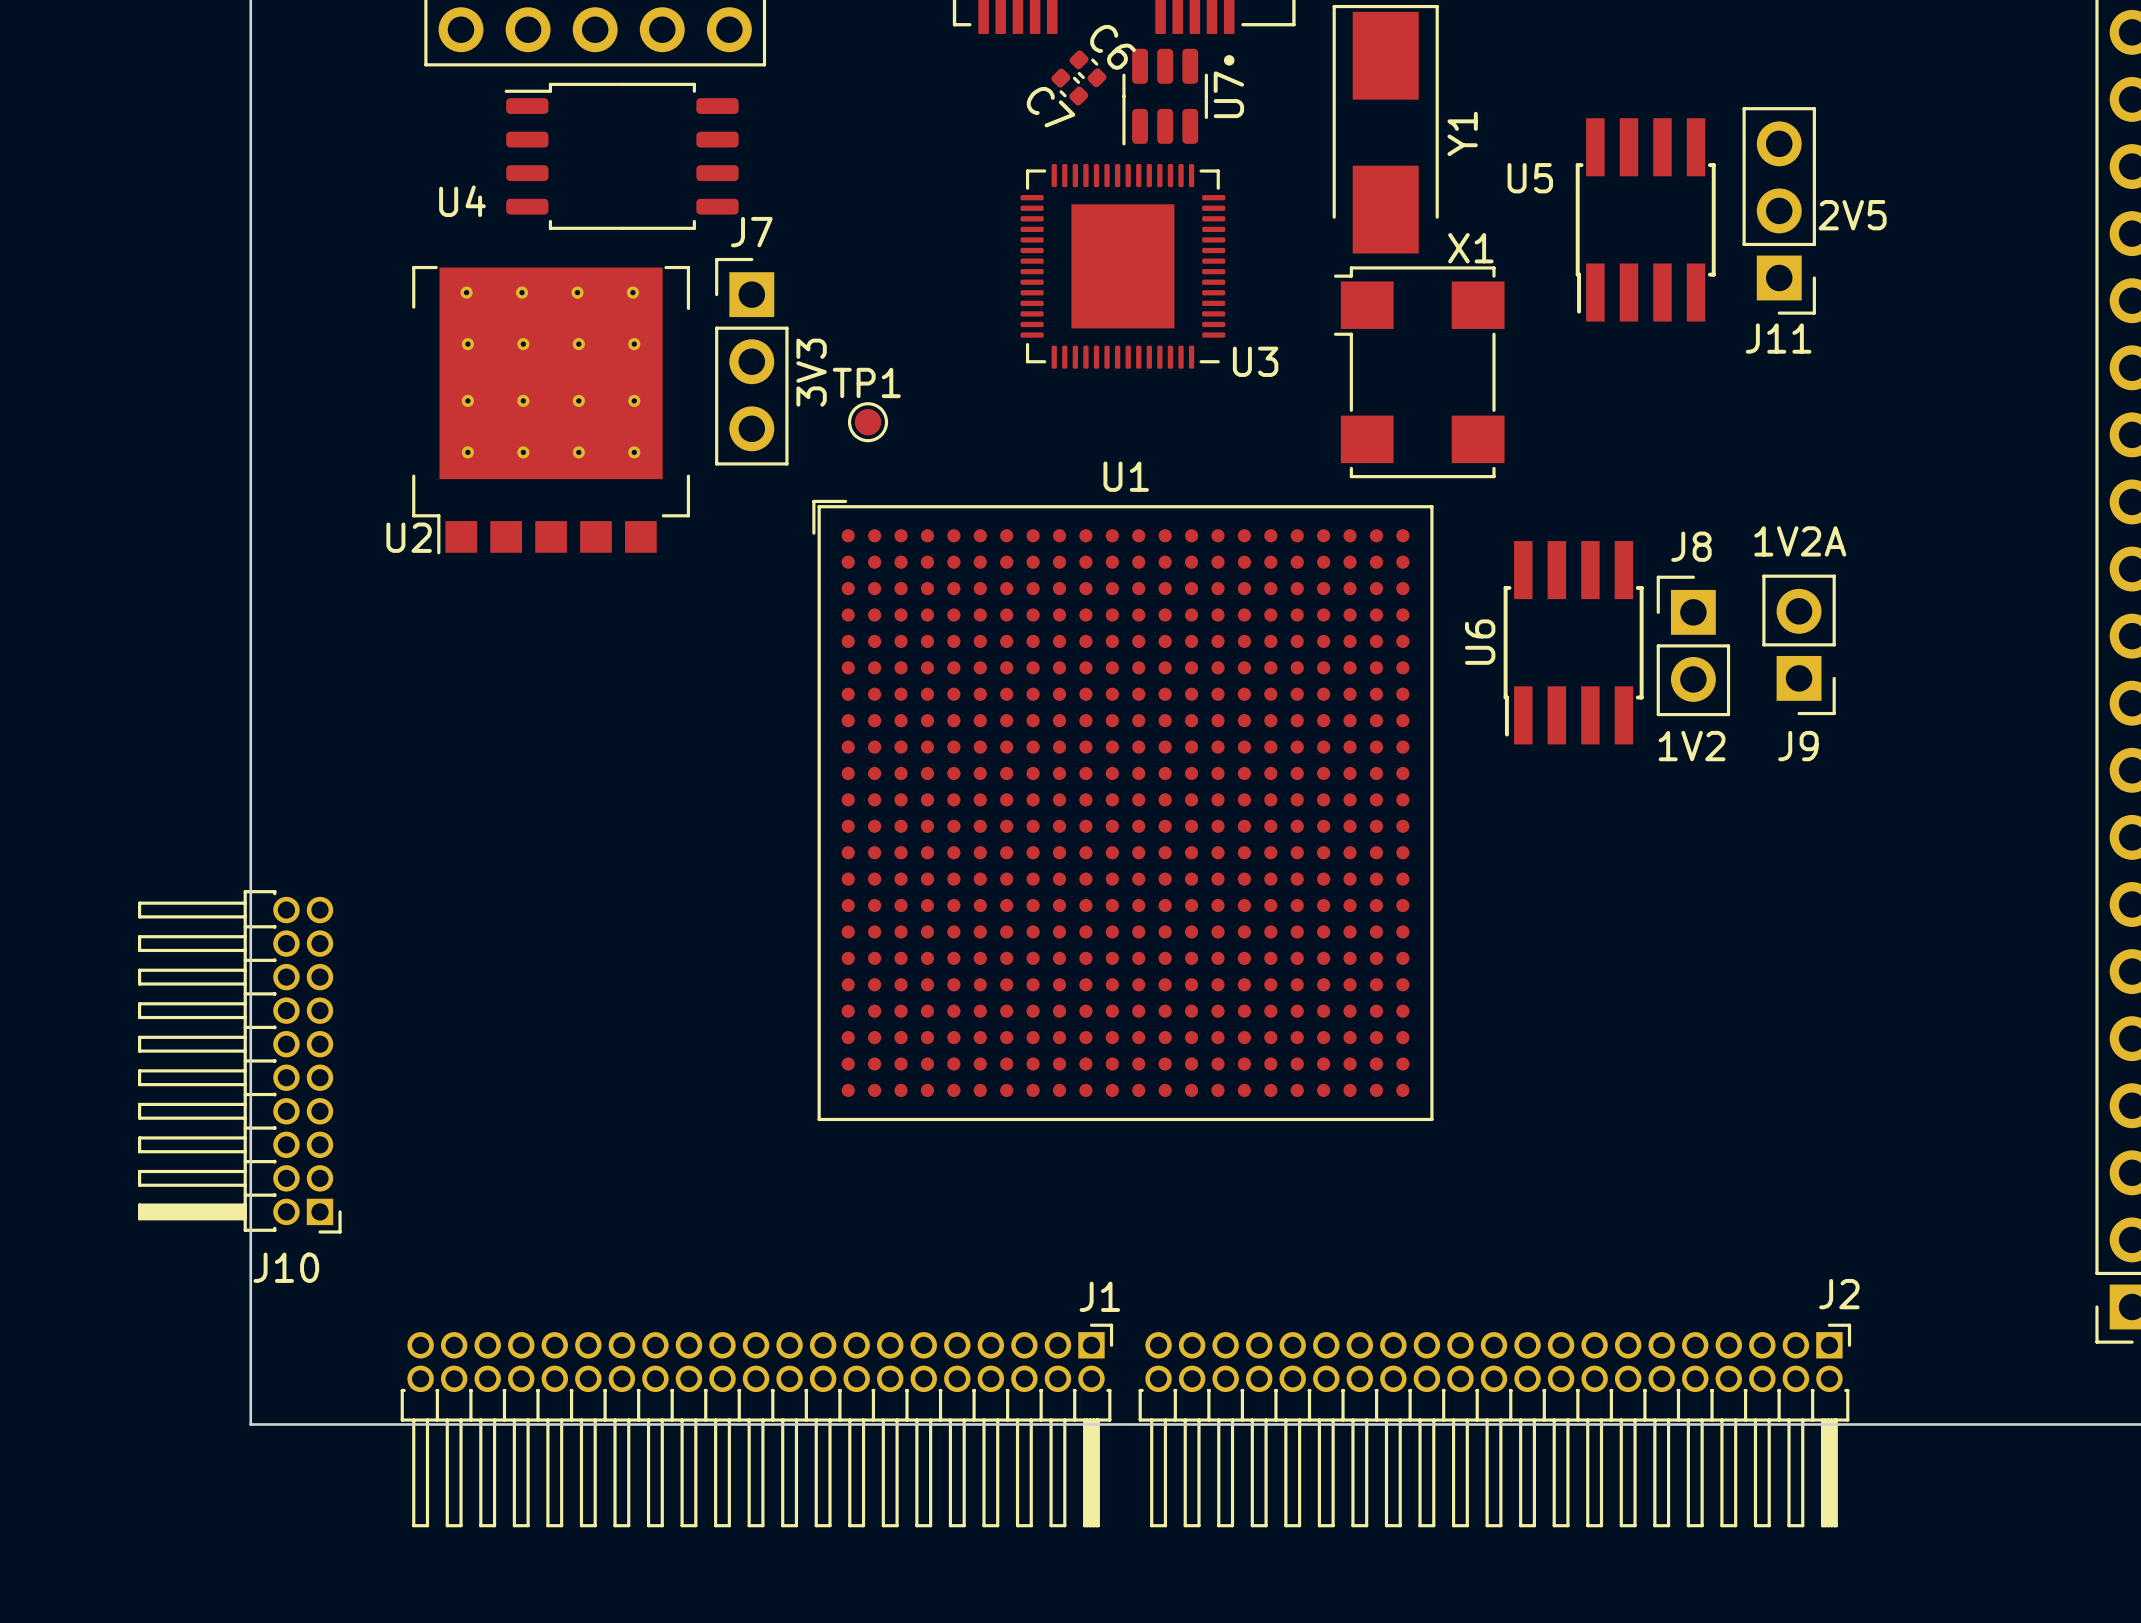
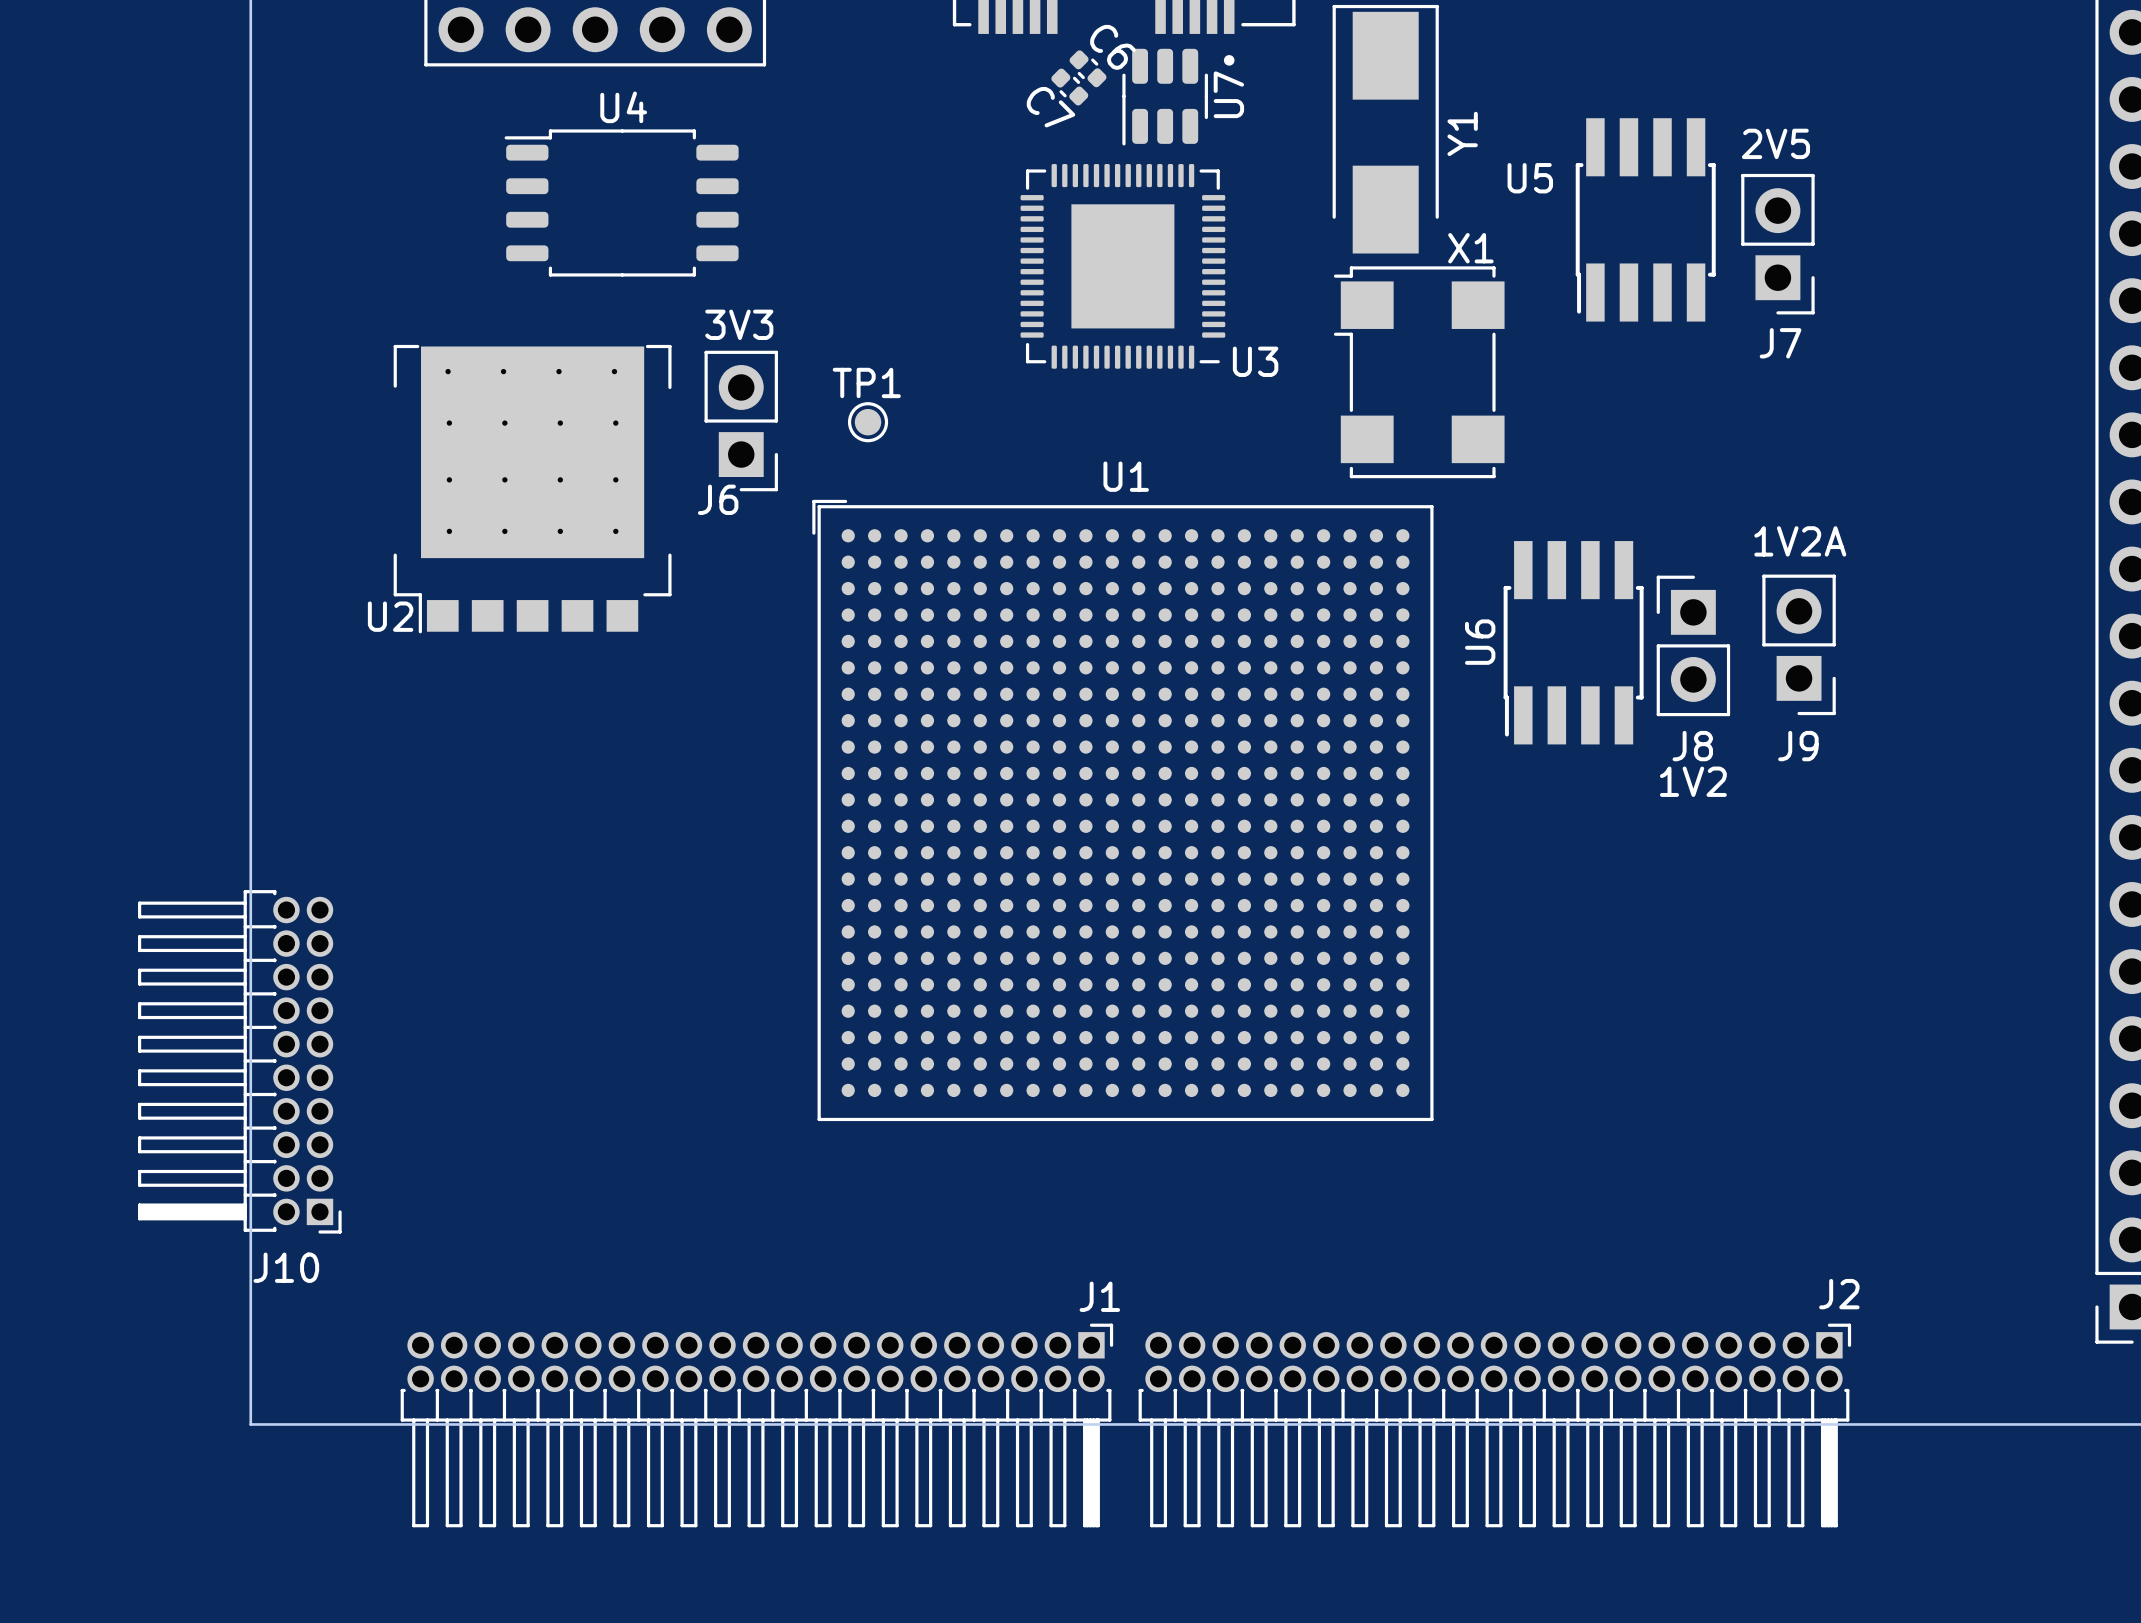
U4 position: (621, 156) -> (621, 202)
U4 name position: U4 (462, 201) -> U4 (623, 107)
J11: (1779, 210) -> none
text position: 2V5 (1852, 215) -> 2V5 (1775, 143)
J7 name position: J7 (751, 232) -> J7 (1780, 343)
J7 footprint: [715, 257, 789, 466] -> [1741, 173, 1815, 315]
text rotation: 0° (811, 372) -> 90° clockwise (739, 324)
U2 position: (551, 410) -> (532, 489)
J6: none -> (741, 421)
J8 name position: J8 (1691, 546) -> J8 (1692, 746)
text position: 1V2 (1692, 746) -> 1V2 (1693, 781)

